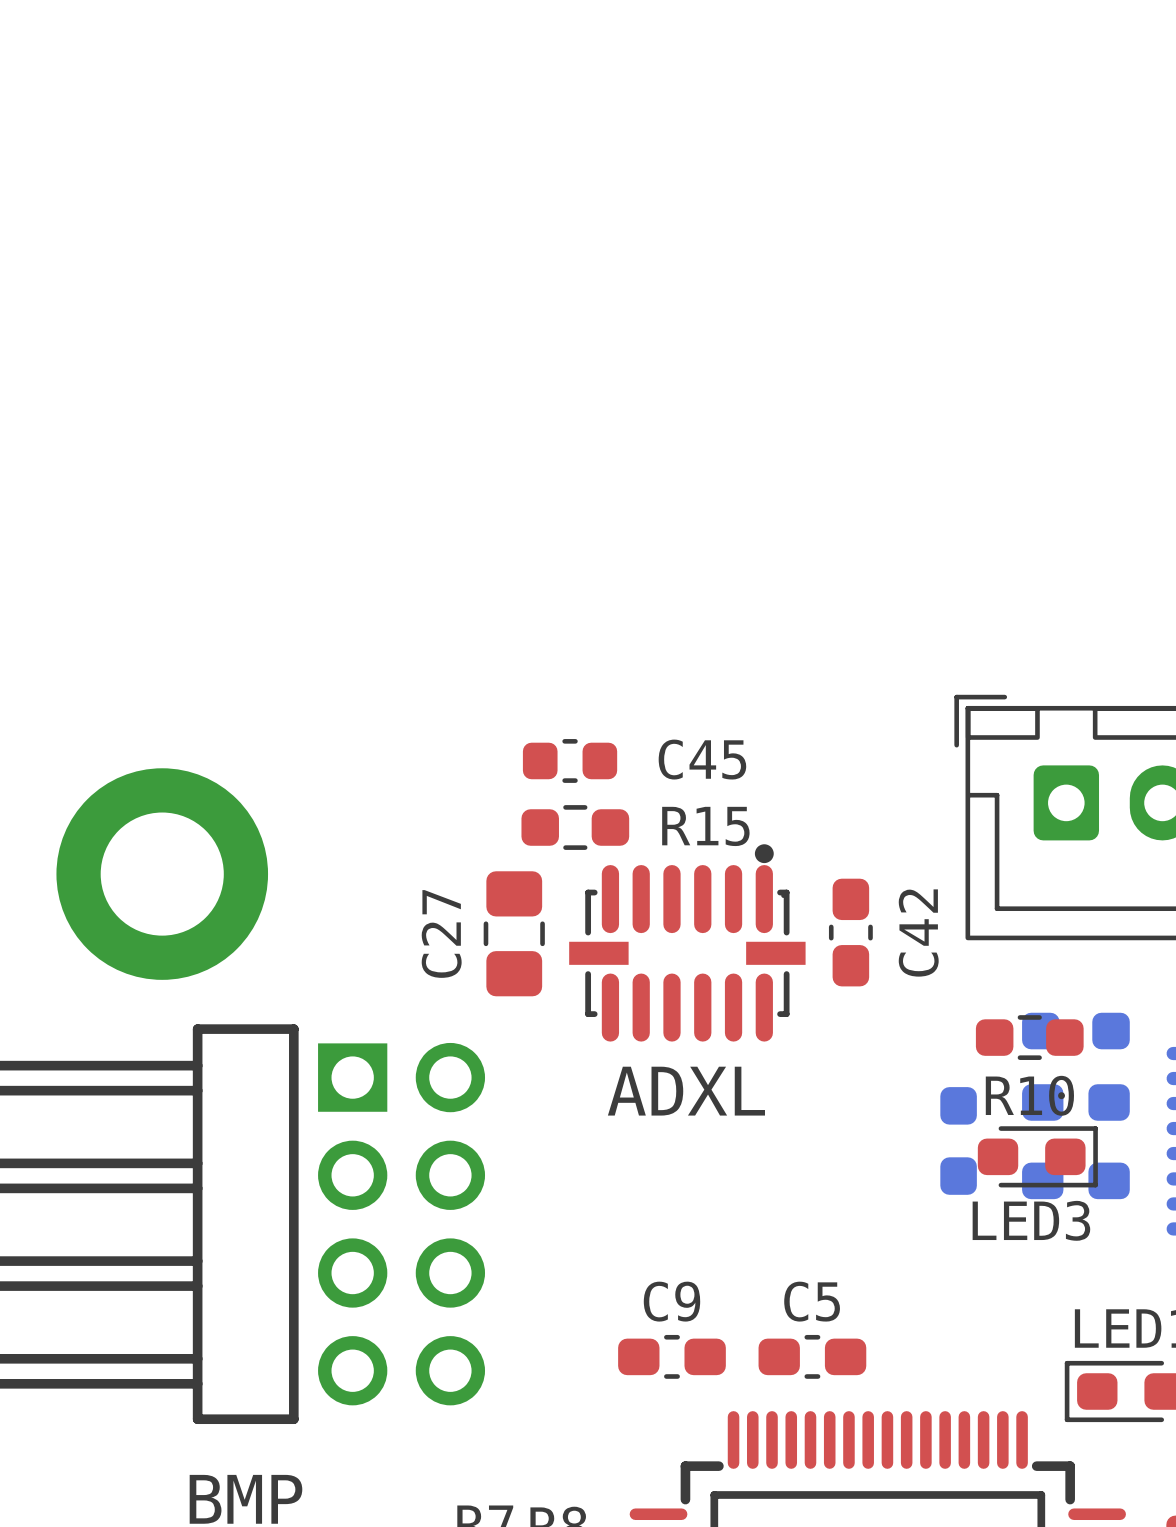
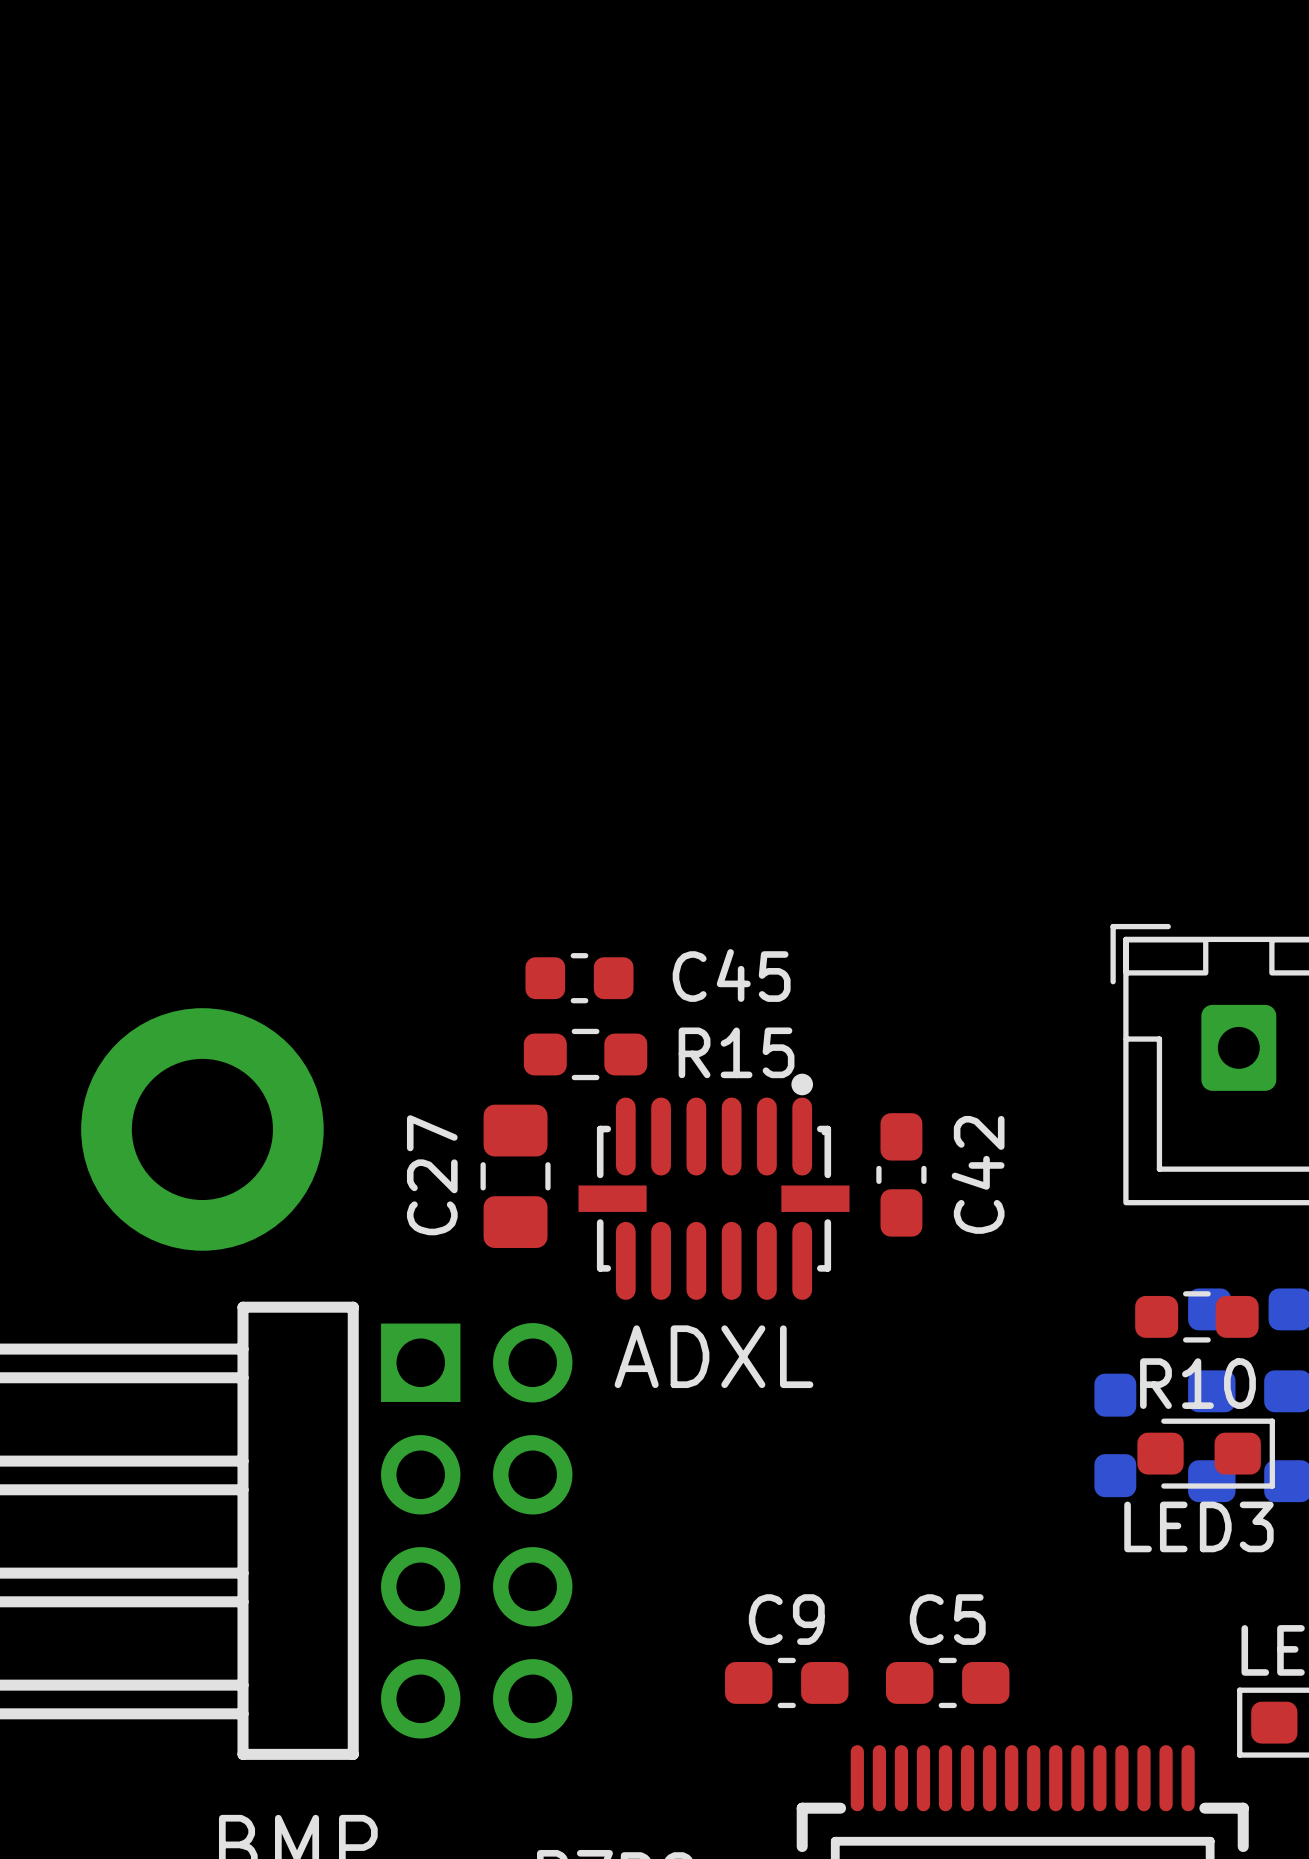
C45 position: (570, 760) -> (579, 978)
R15 position: (575, 827) -> (585, 1054)
C42 position: (850, 932) -> (901, 1174)
C27 position: (514, 933) -> (515, 1176)
part position: (687, 942) -> (714, 1186)

